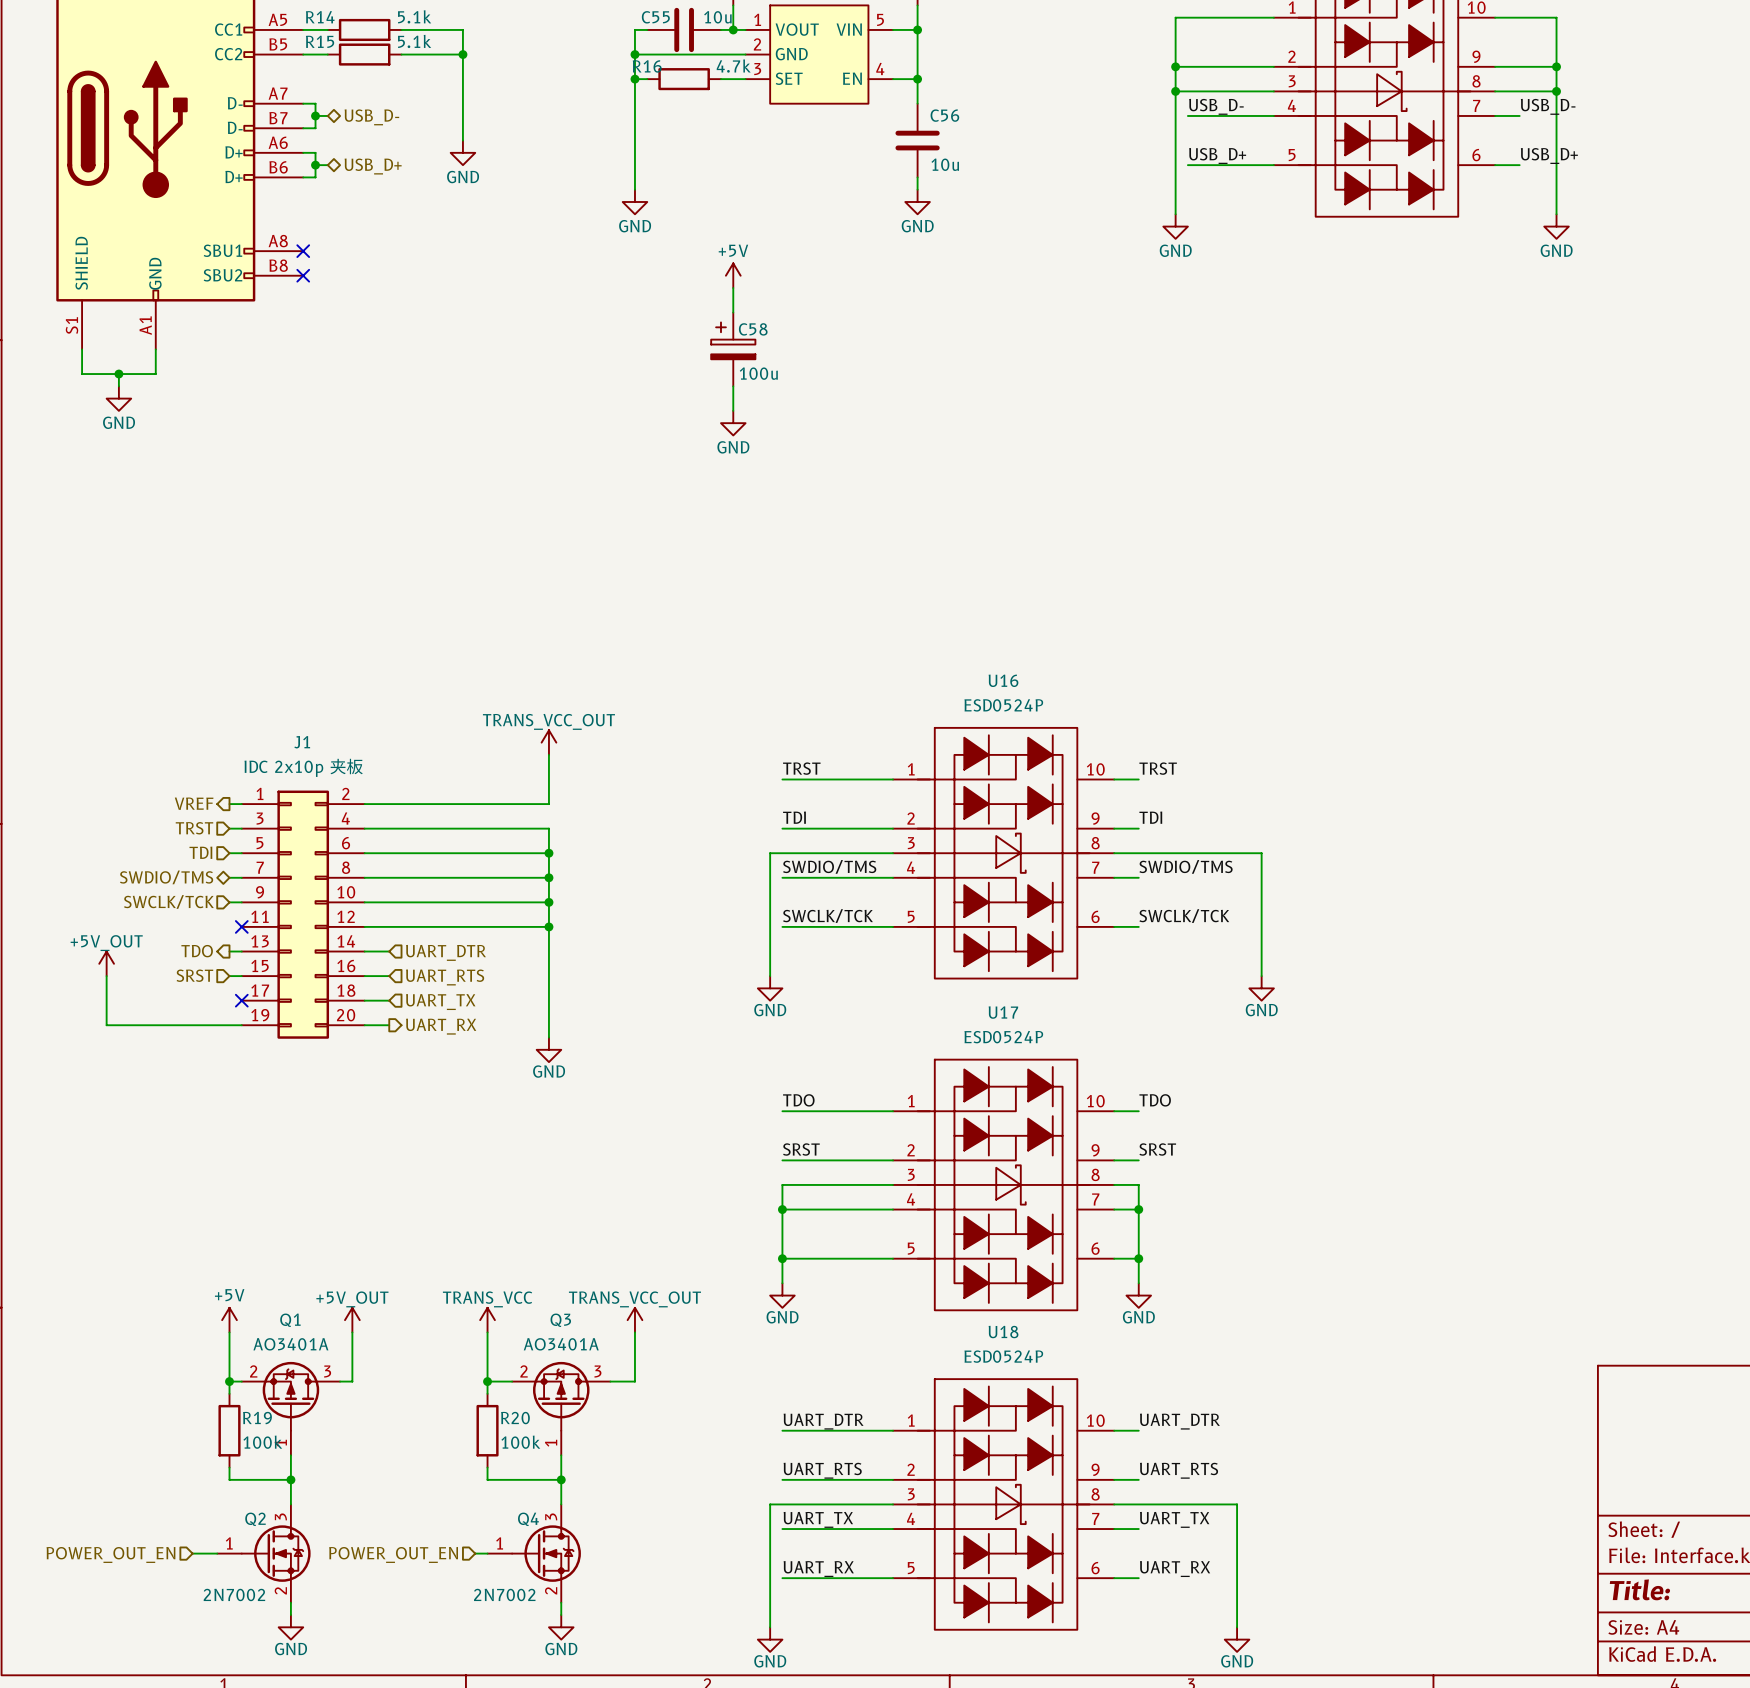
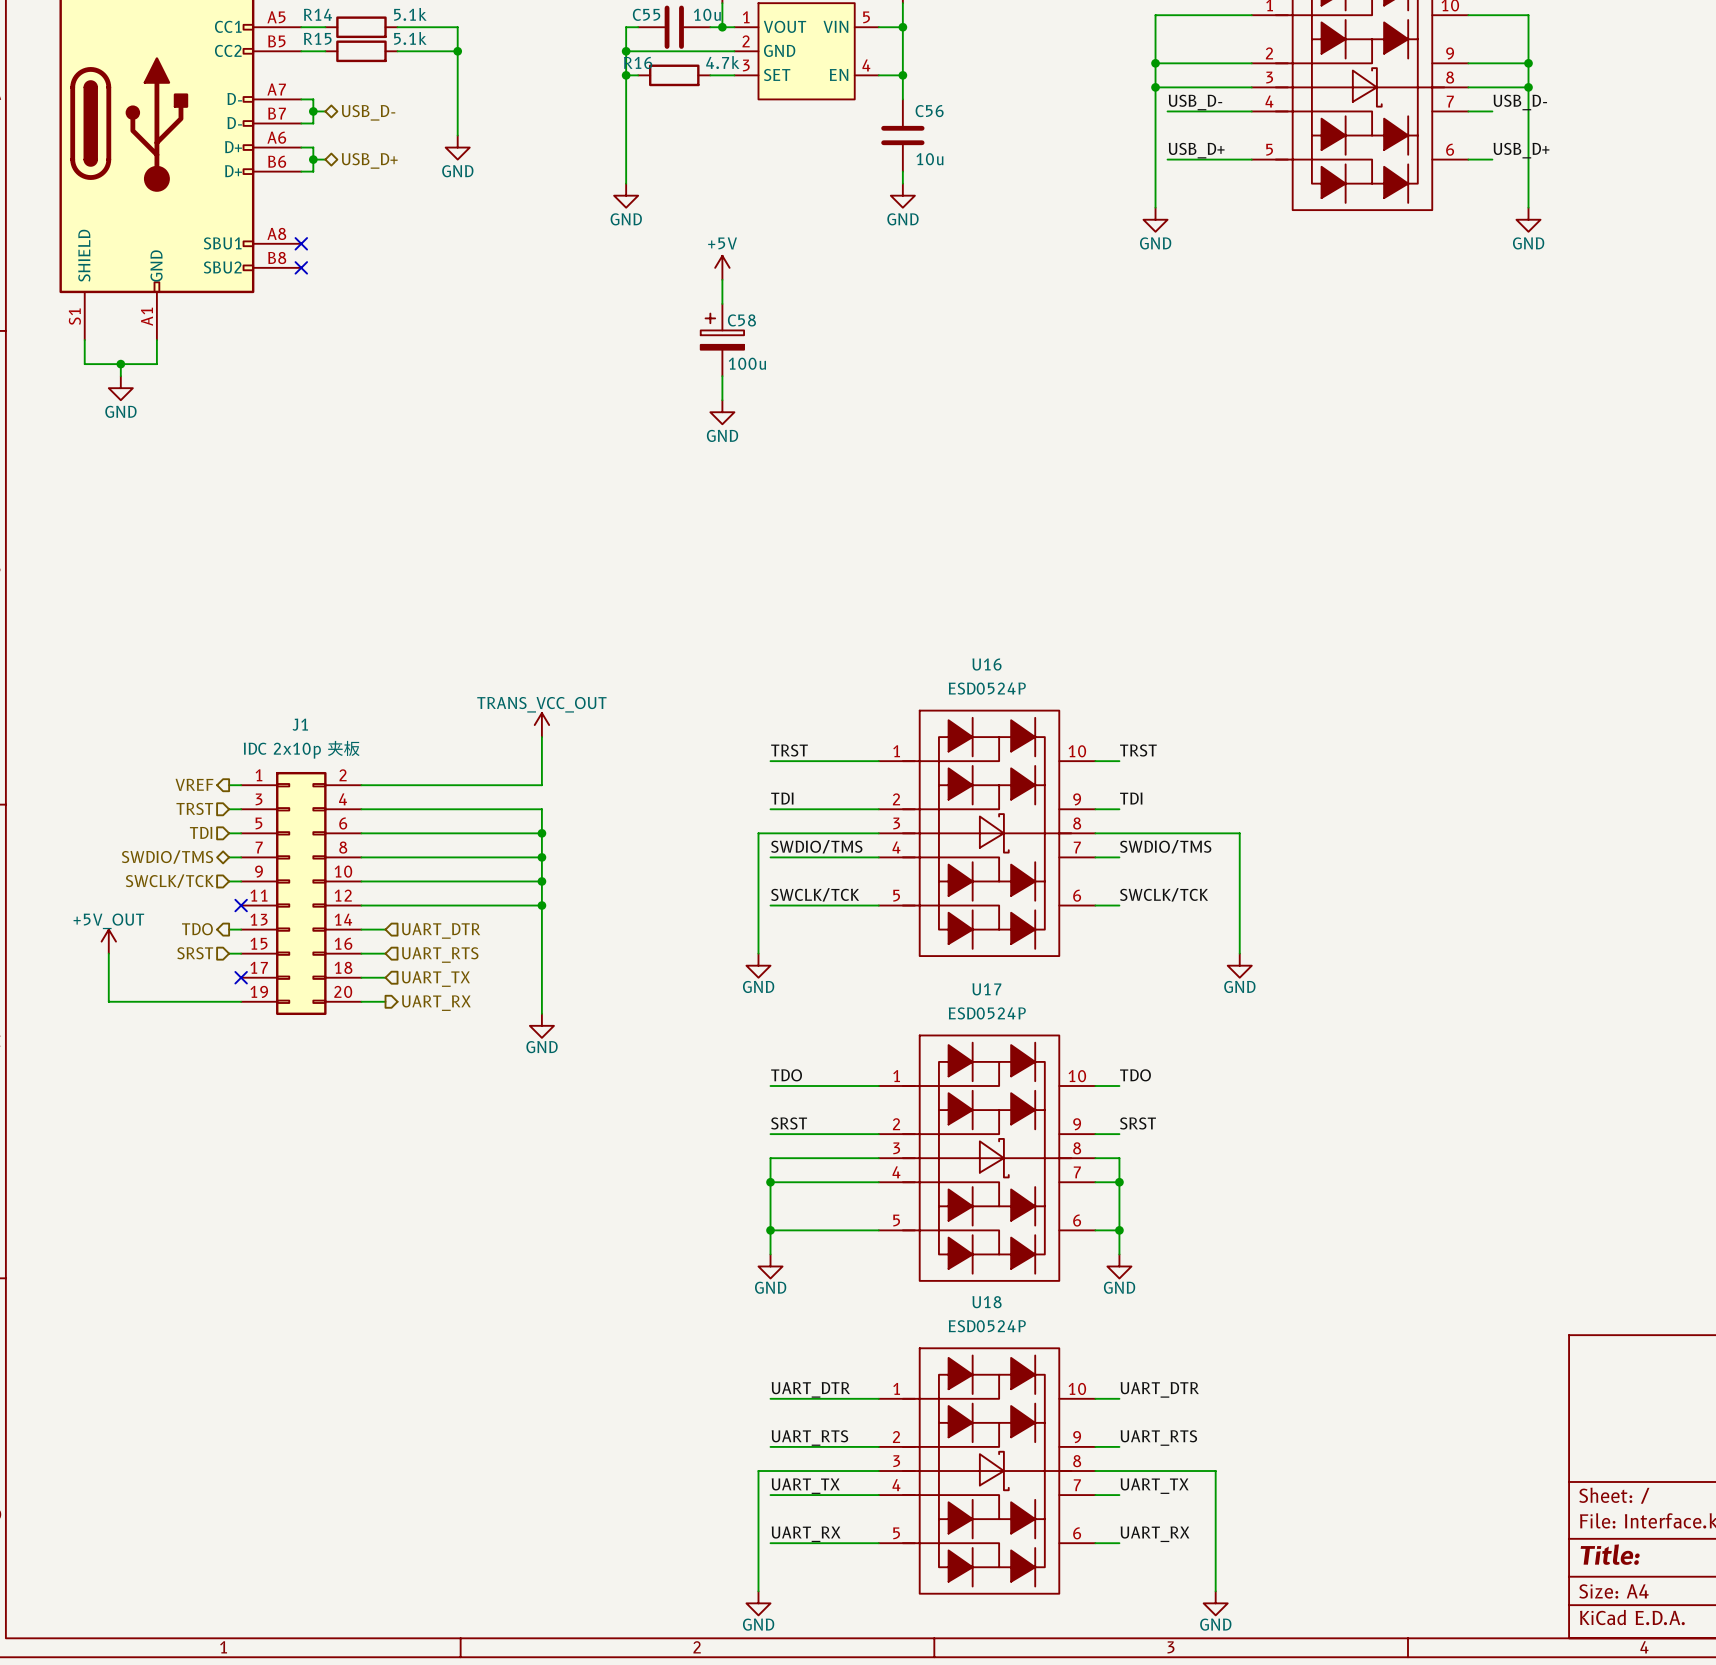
power symbol: +5V (229, 1320) -> none
power symbol: +5V_OUT (352, 1320) -> none
power symbol: TRANS_VCC (487, 1320) -> none
power symbol: TRANS_VCC_OUT (634, 1320) -> none
wire: (229, 1332) (229, 1393) -> none
wire: (352, 1332) (352, 1381) (340, 1381) -> none
wire: (487, 1332) (487, 1393) -> none
wire: (634, 1332) (634, 1381) (610, 1381) -> none
wire: (229, 1381) (241, 1381) -> none
junction: (229, 1381) -> none
wire: (487, 1381) (512, 1381) -> none
junction: (487, 1381) -> none
Q1: AO3401A (290, 1408) -> none
Q3: AO3401A (561, 1408) -> none
R19: 100k (229, 1430) -> none
R20: 100k (487, 1430) -> none
wire: (290, 1455) (290, 1504) -> none
wire: (561, 1455) (561, 1504) -> none
wire: (229, 1467) (229, 1479) (290, 1479) -> none
wire: (487, 1467) (487, 1479) (561, 1479) -> none
junction: (290, 1479) -> none
junction: (561, 1479) -> none
wire: (192, 1553) (217, 1553) -> none
Q2: 2N7002 (263, 1553) -> none
wire: (475, 1553) (487, 1553) -> none
Q4: 2N7002 (534, 1553) -> none
hierarchical label: POWER_OUT_EN (110, 1554) -> none
hierarchical label: POWER_OUT_EN (393, 1554) -> none
wire: (290, 1602) (290, 1615) -> none
wire: (561, 1602) (561, 1615) -> none
power symbol: GND (290, 1627) -> none
power symbol: GND (561, 1627) -> none

